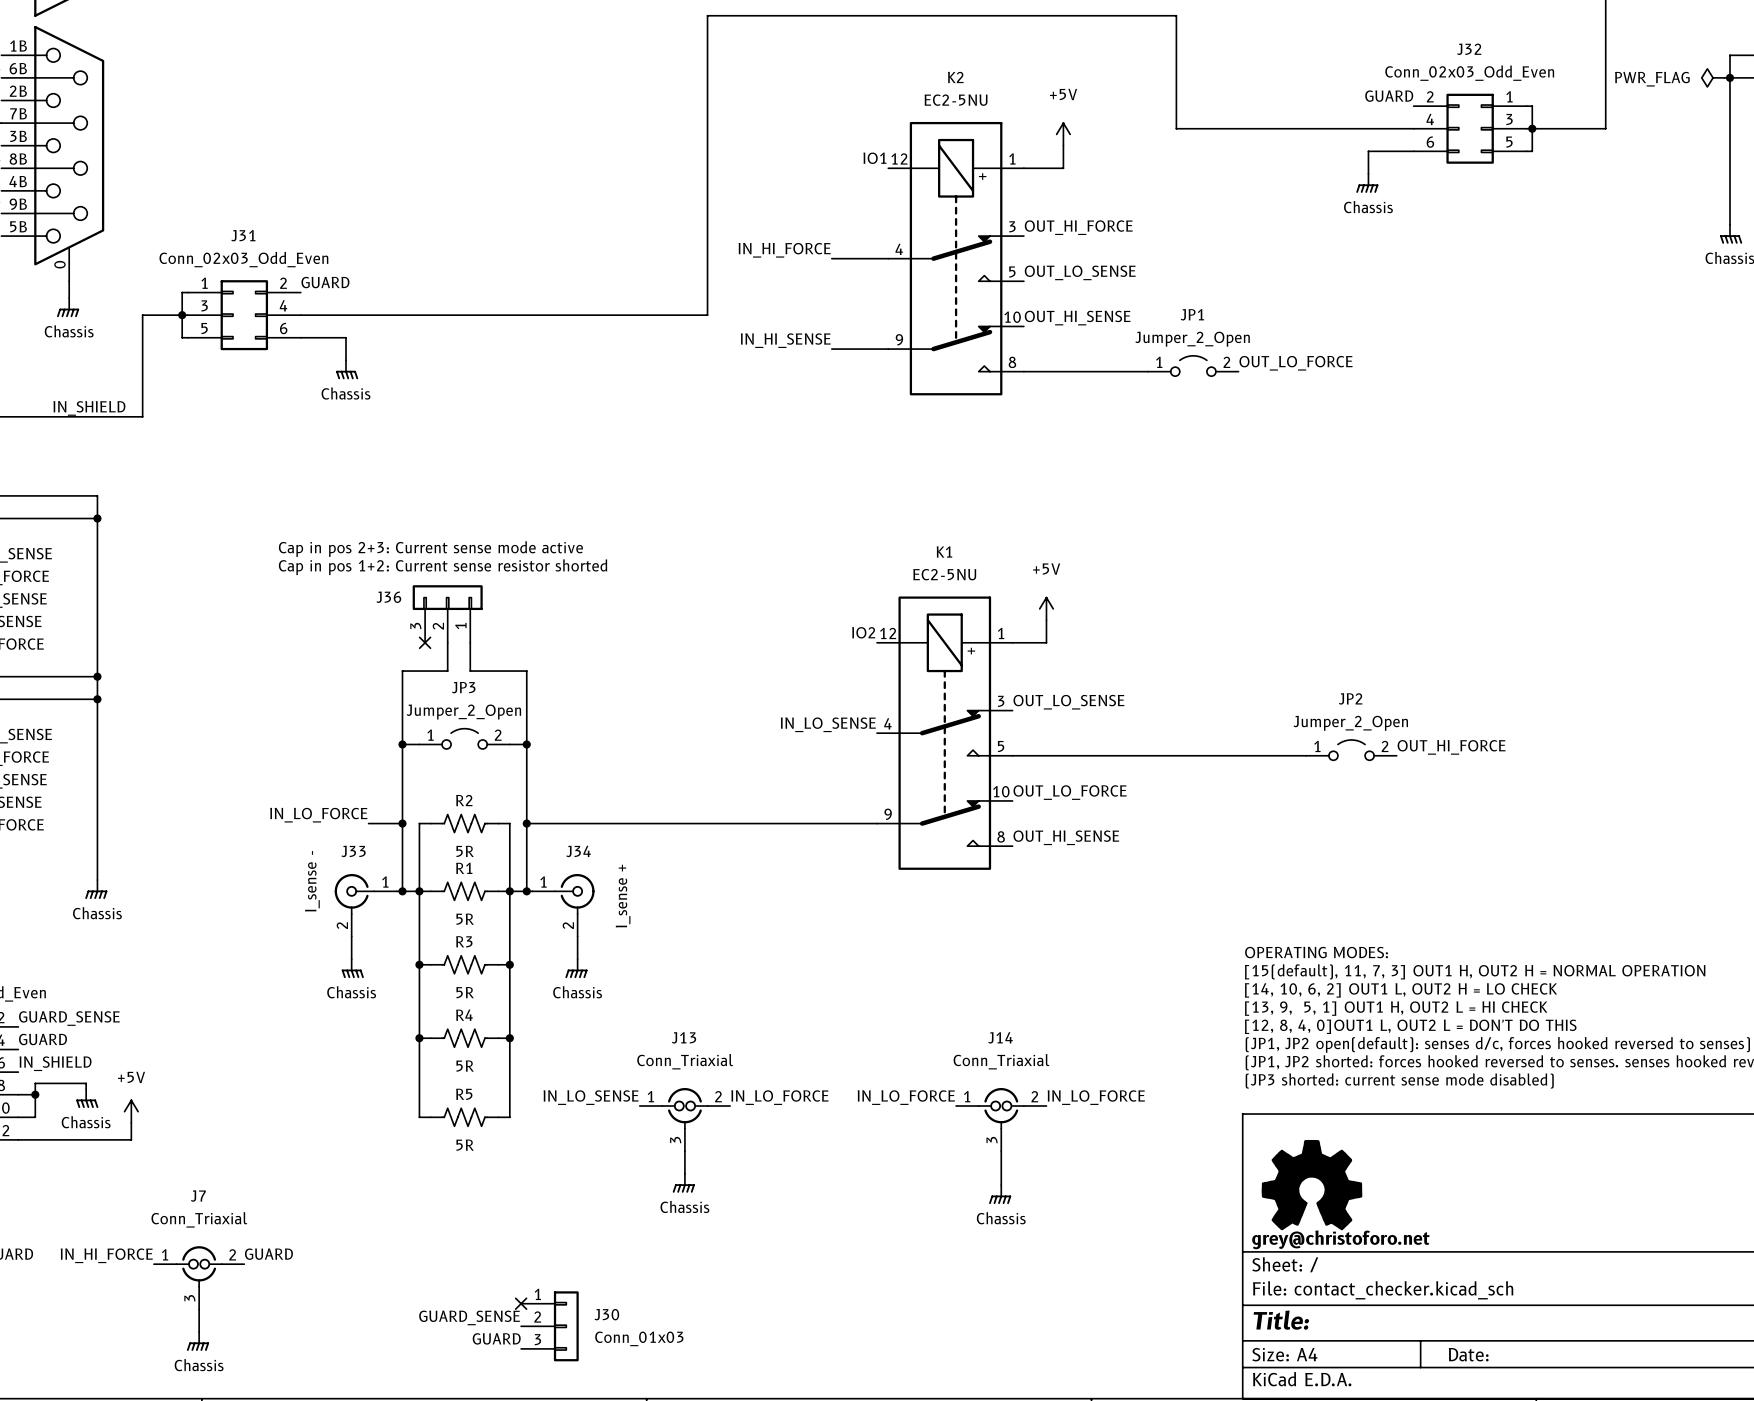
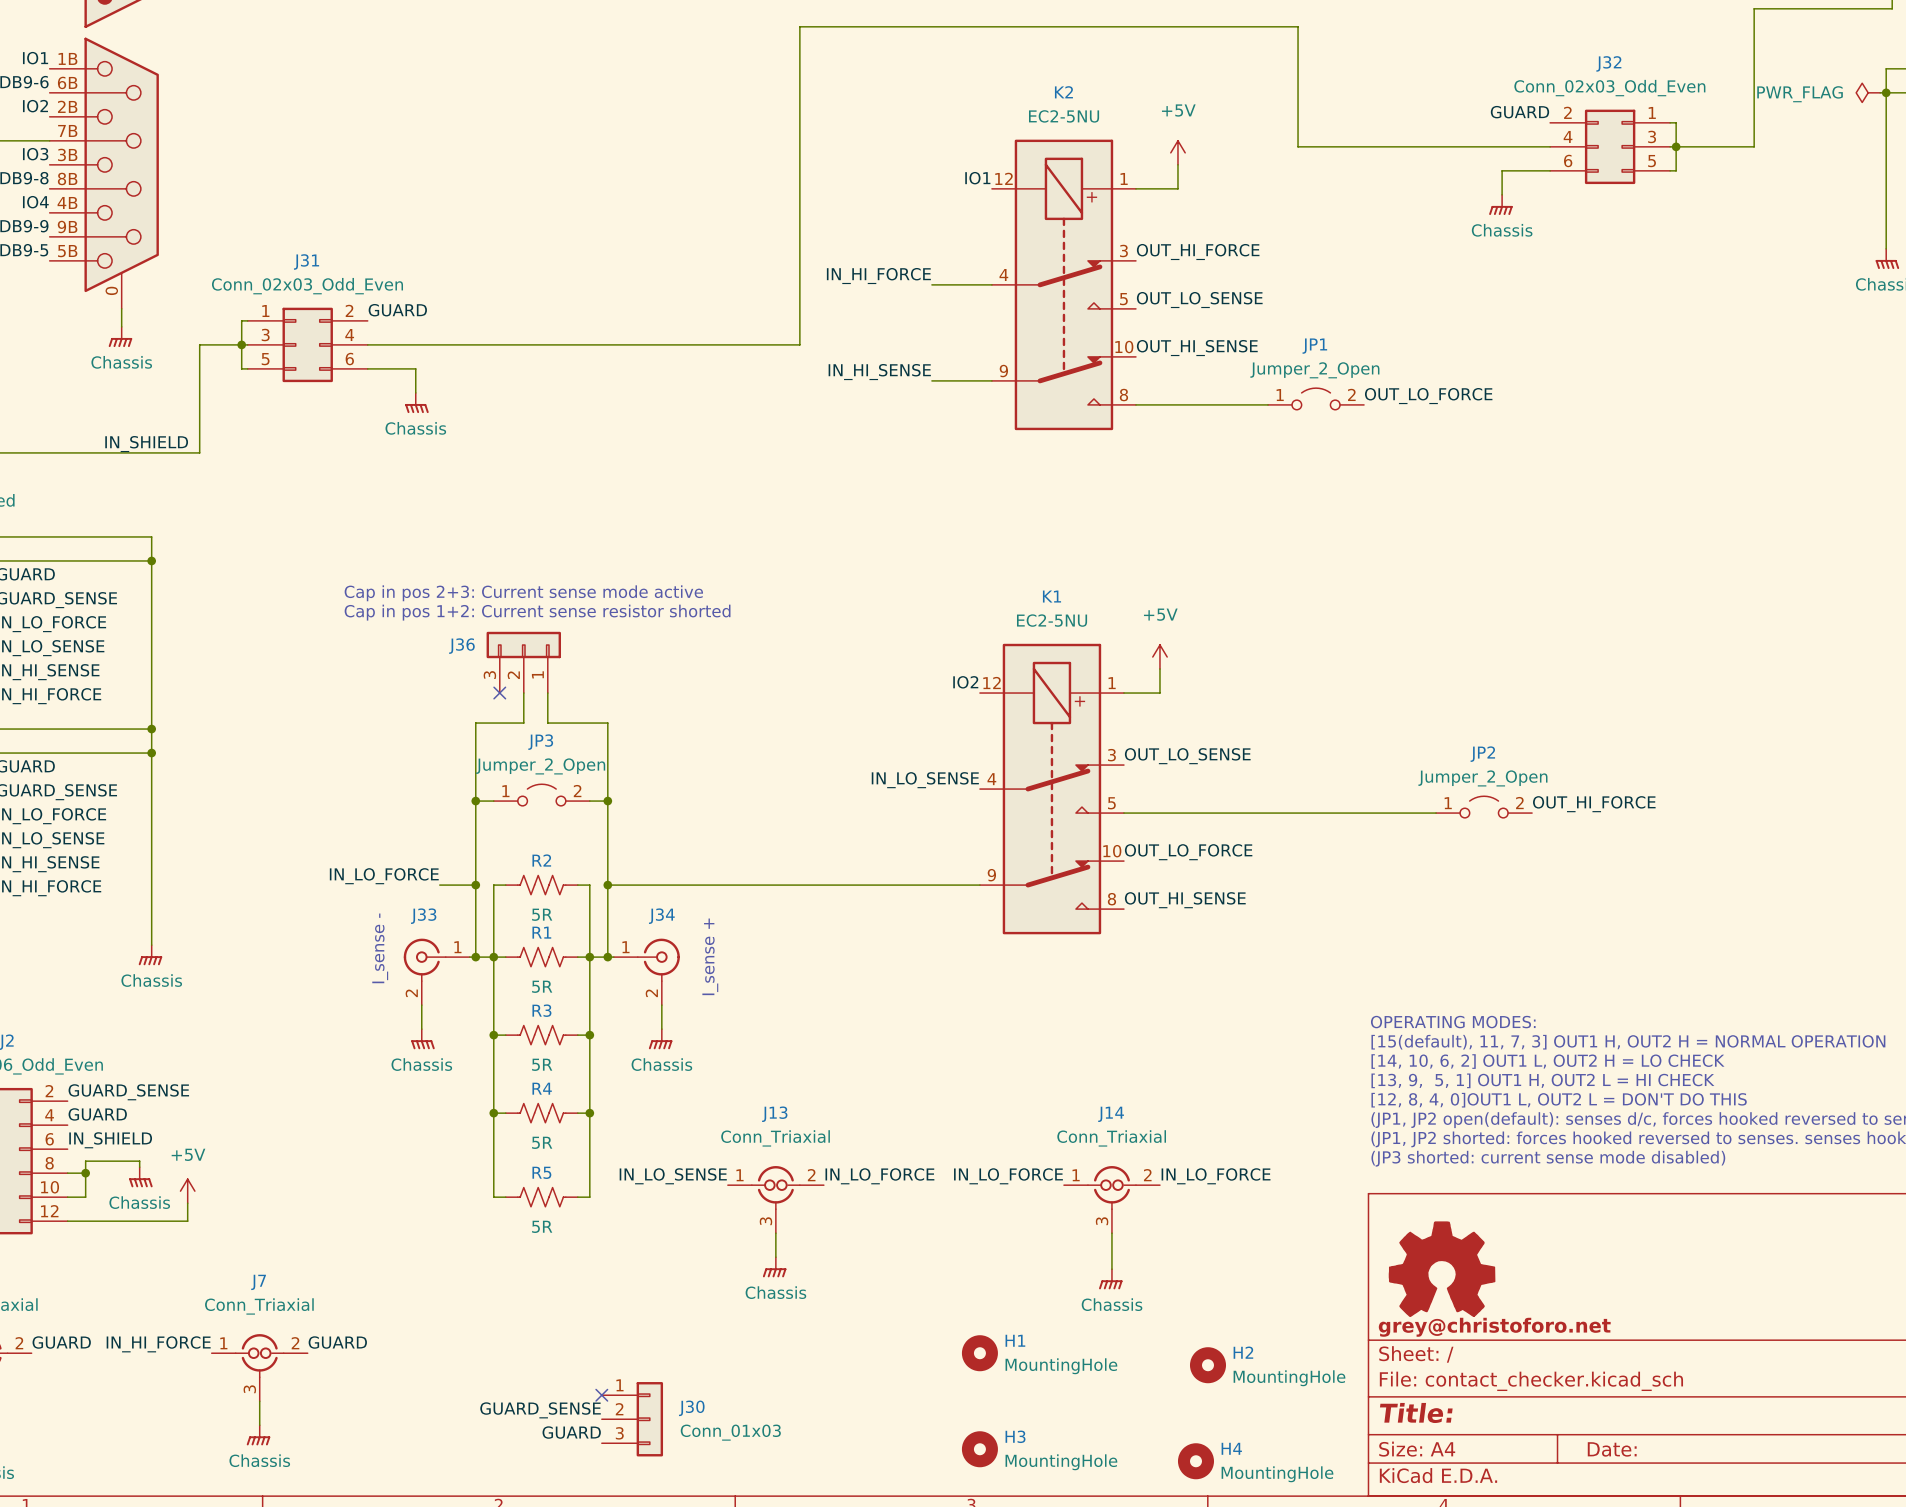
H1: none -> MountingHole (979, 1353)
H2: none -> MountingHole (1207, 1365)
H3: none -> MountingHole (979, 1449)
H4: none -> MountingHole (1195, 1461)

